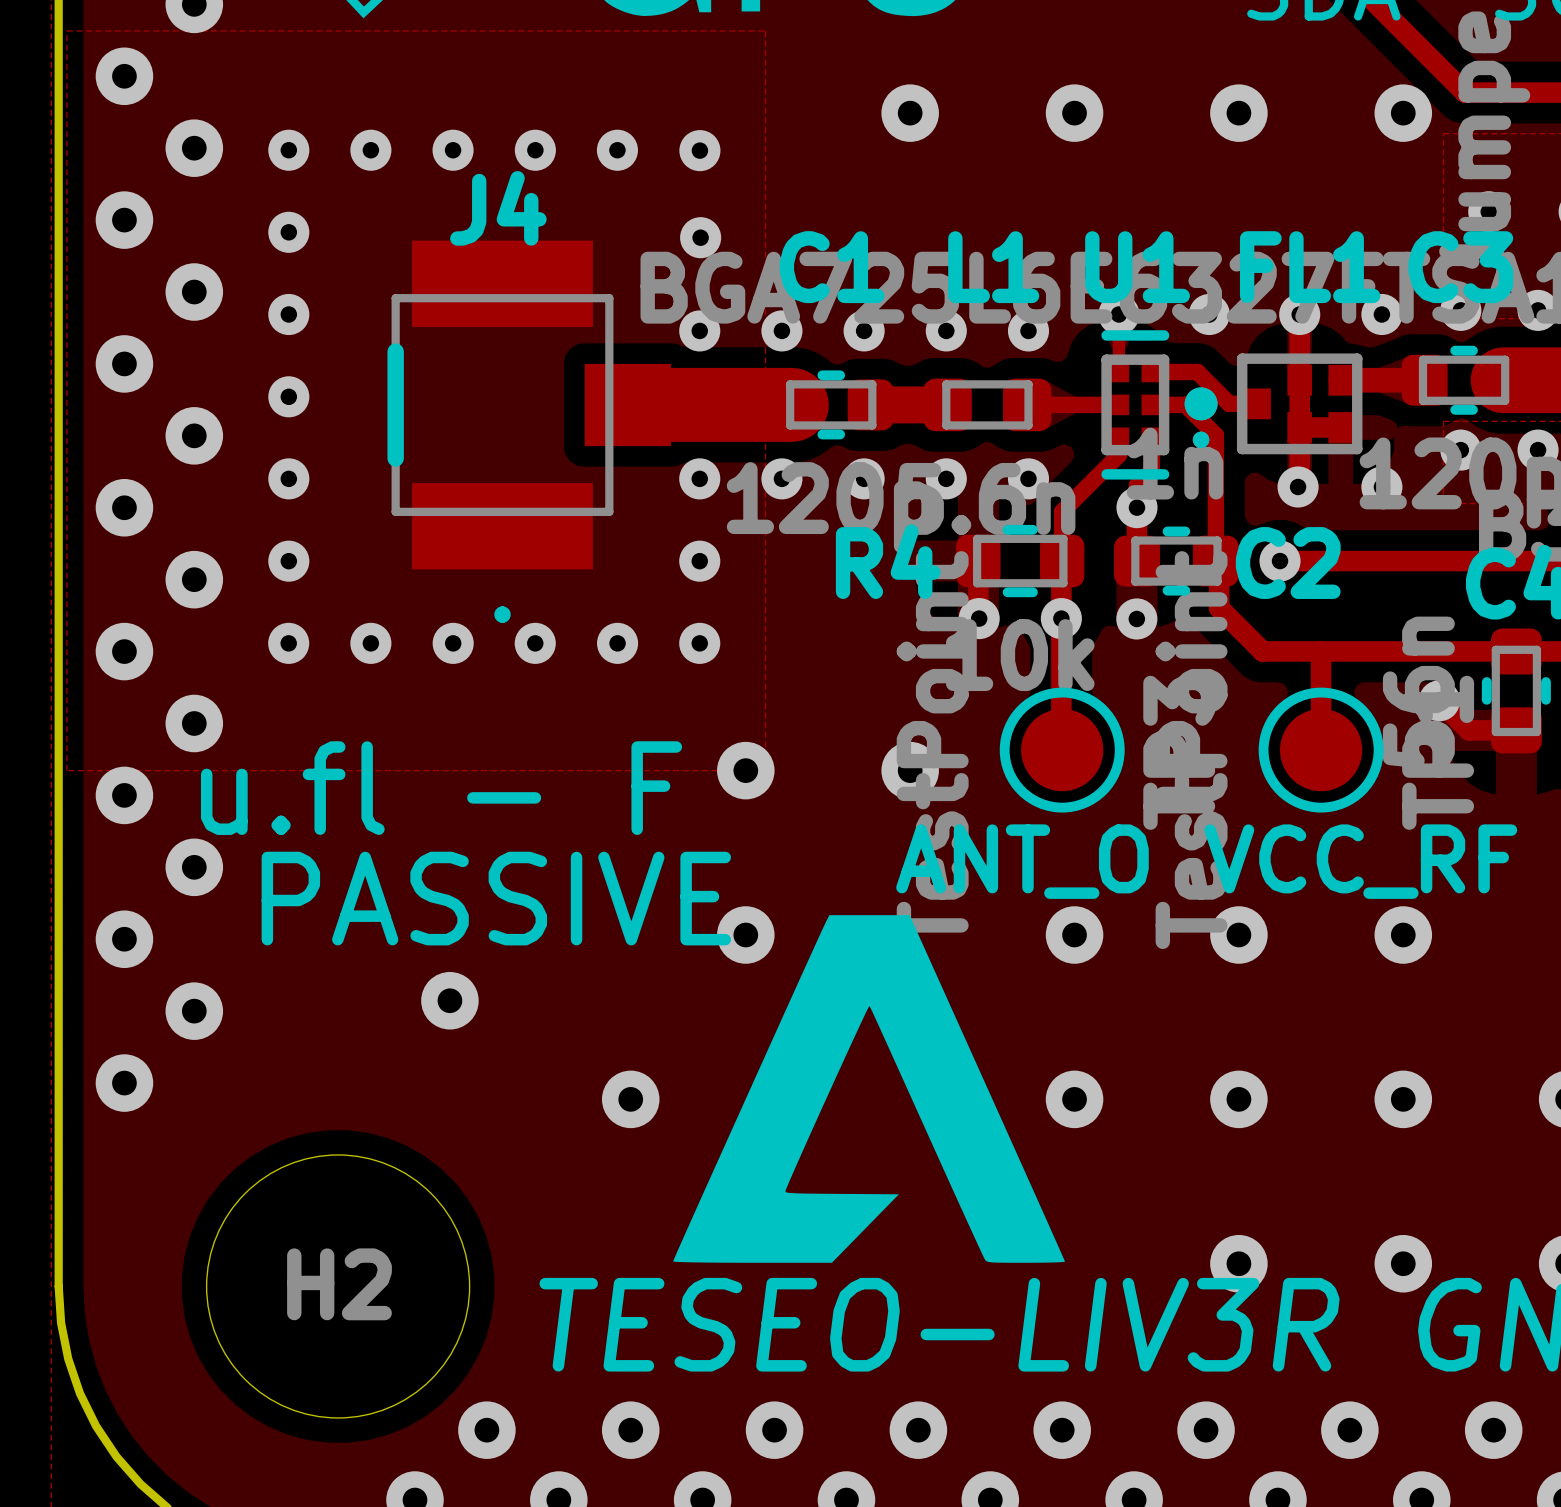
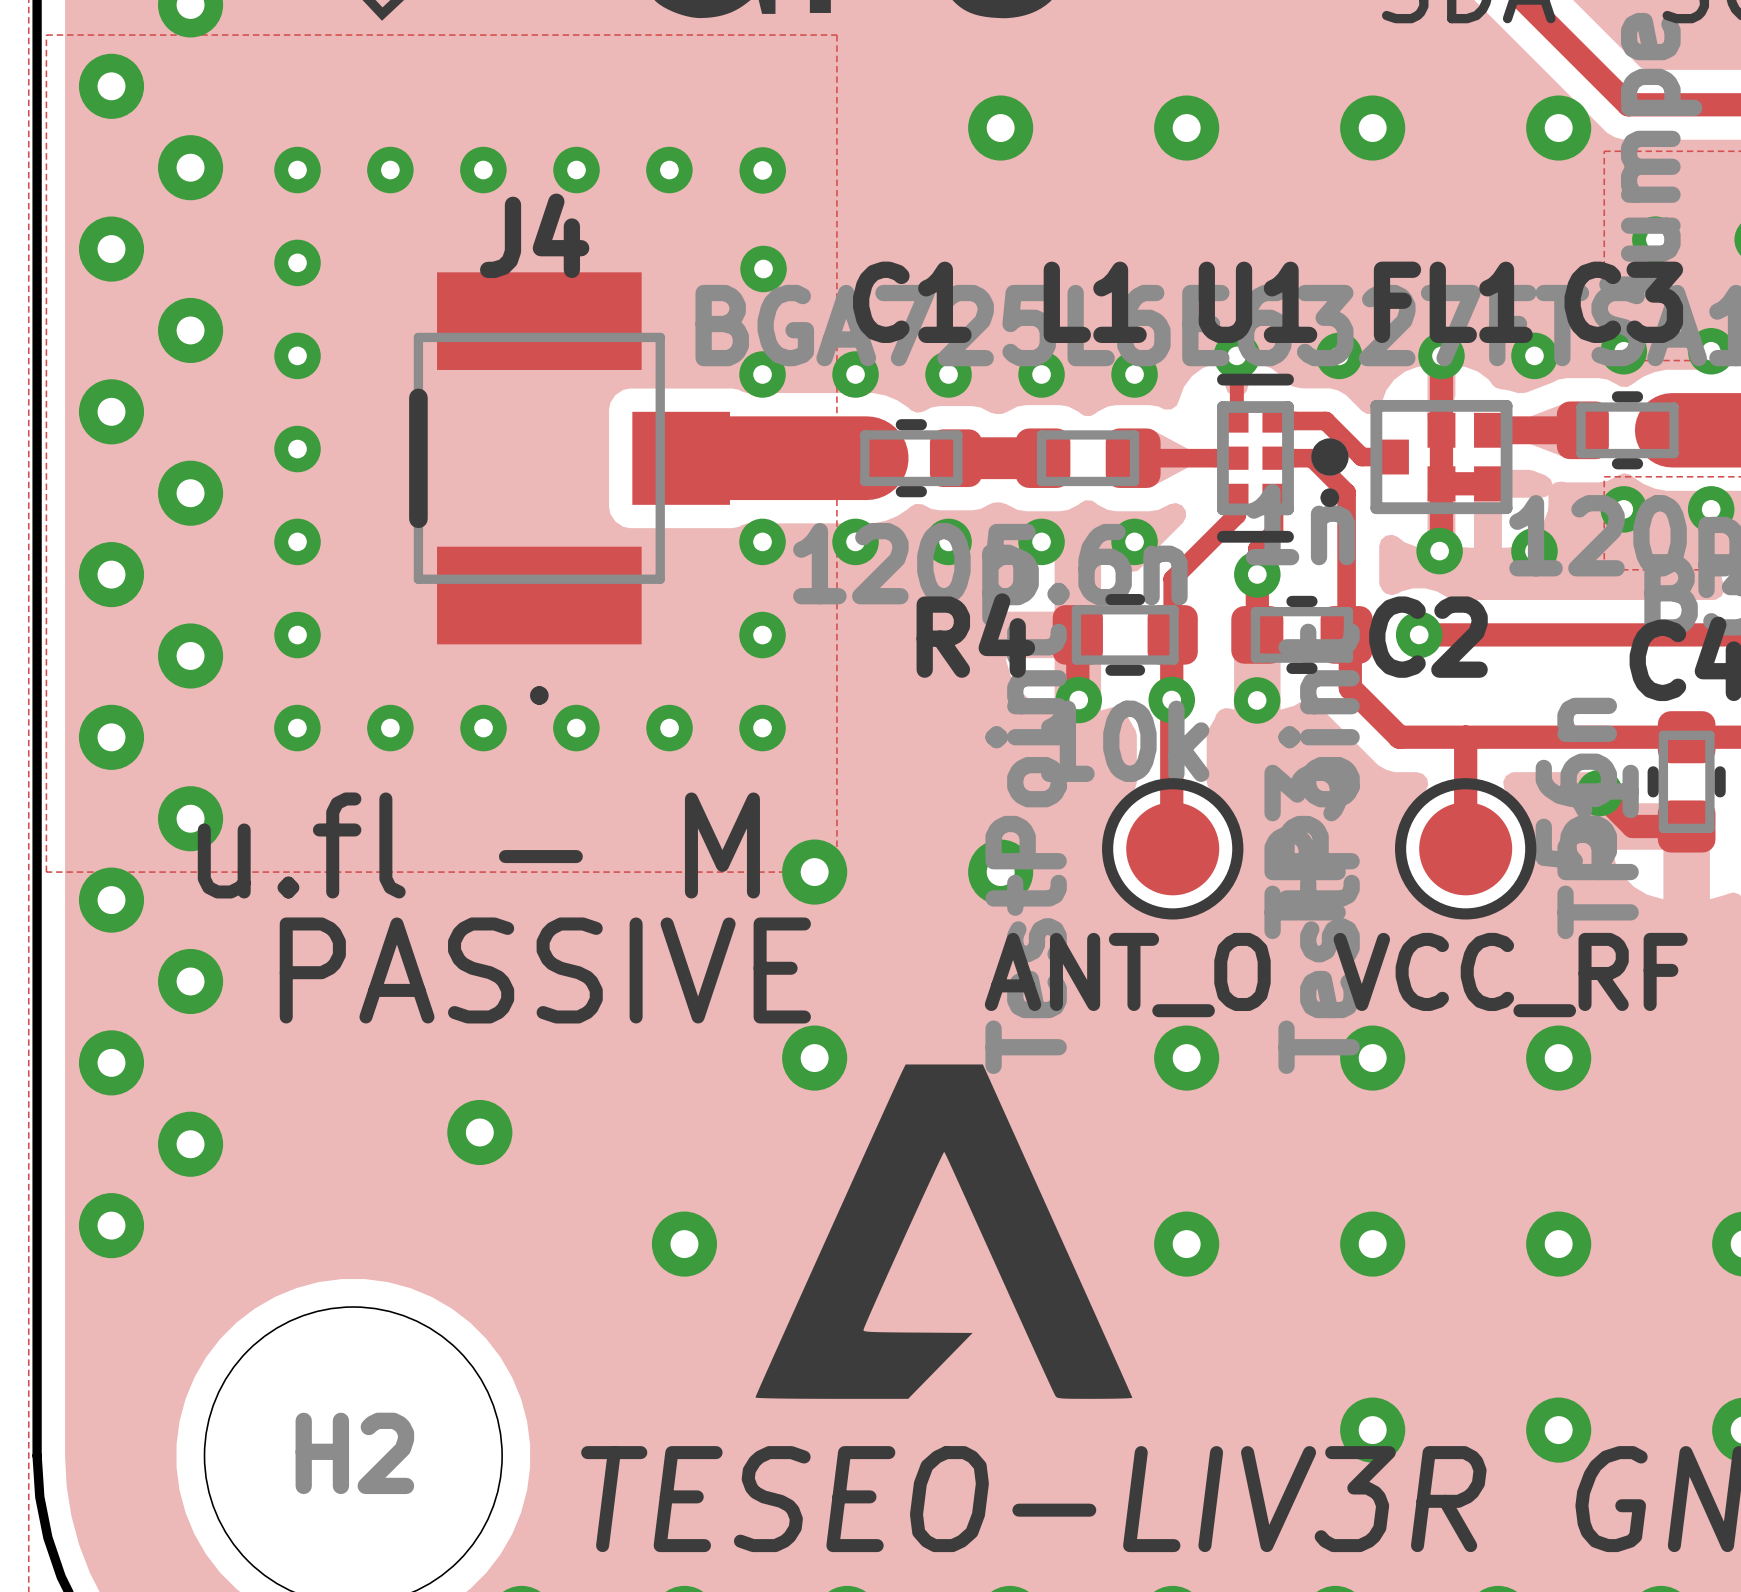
text: u.fl - F (441, 788) -> u.fl - M (478, 845)
text position: PASSIVE (496, 898) -> PASSIVE (545, 970)
drawing shape: [673, 915, 1065, 1263] -> [755, 1064, 1133, 1399]

